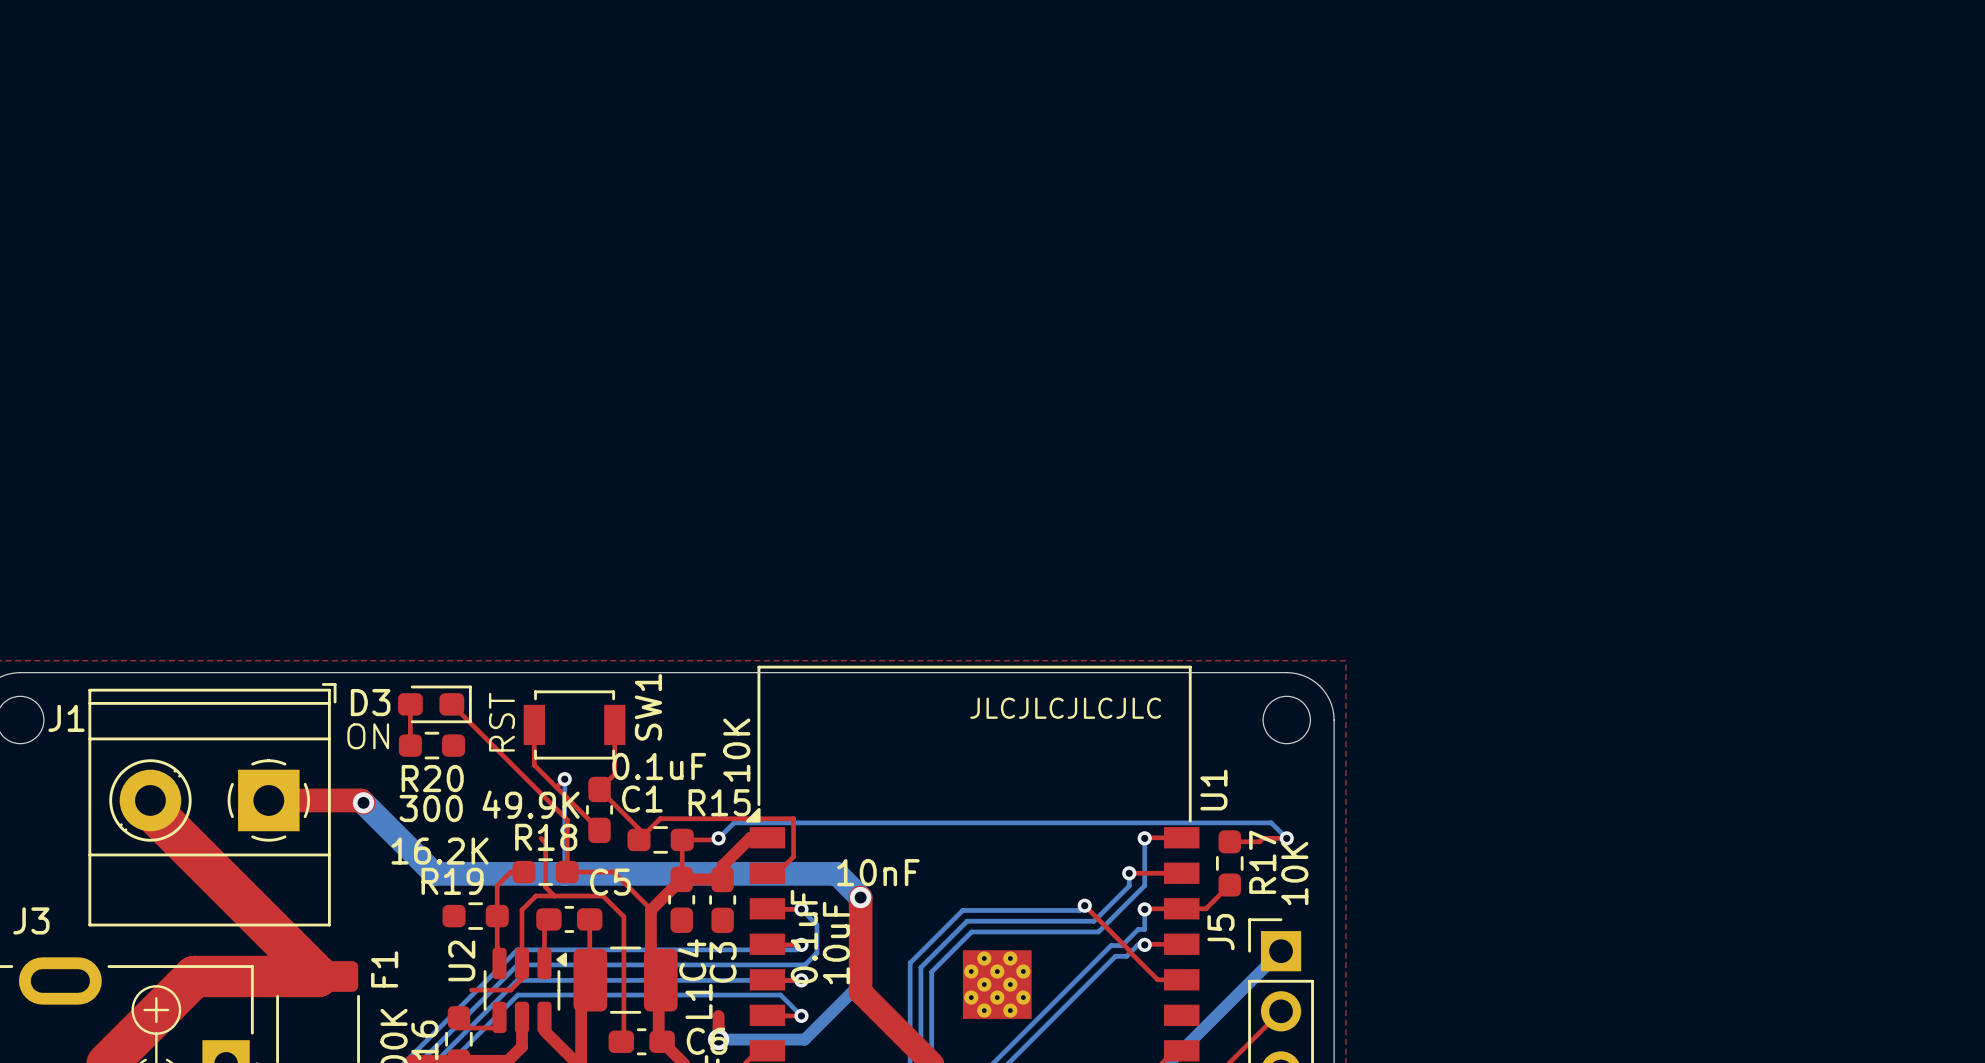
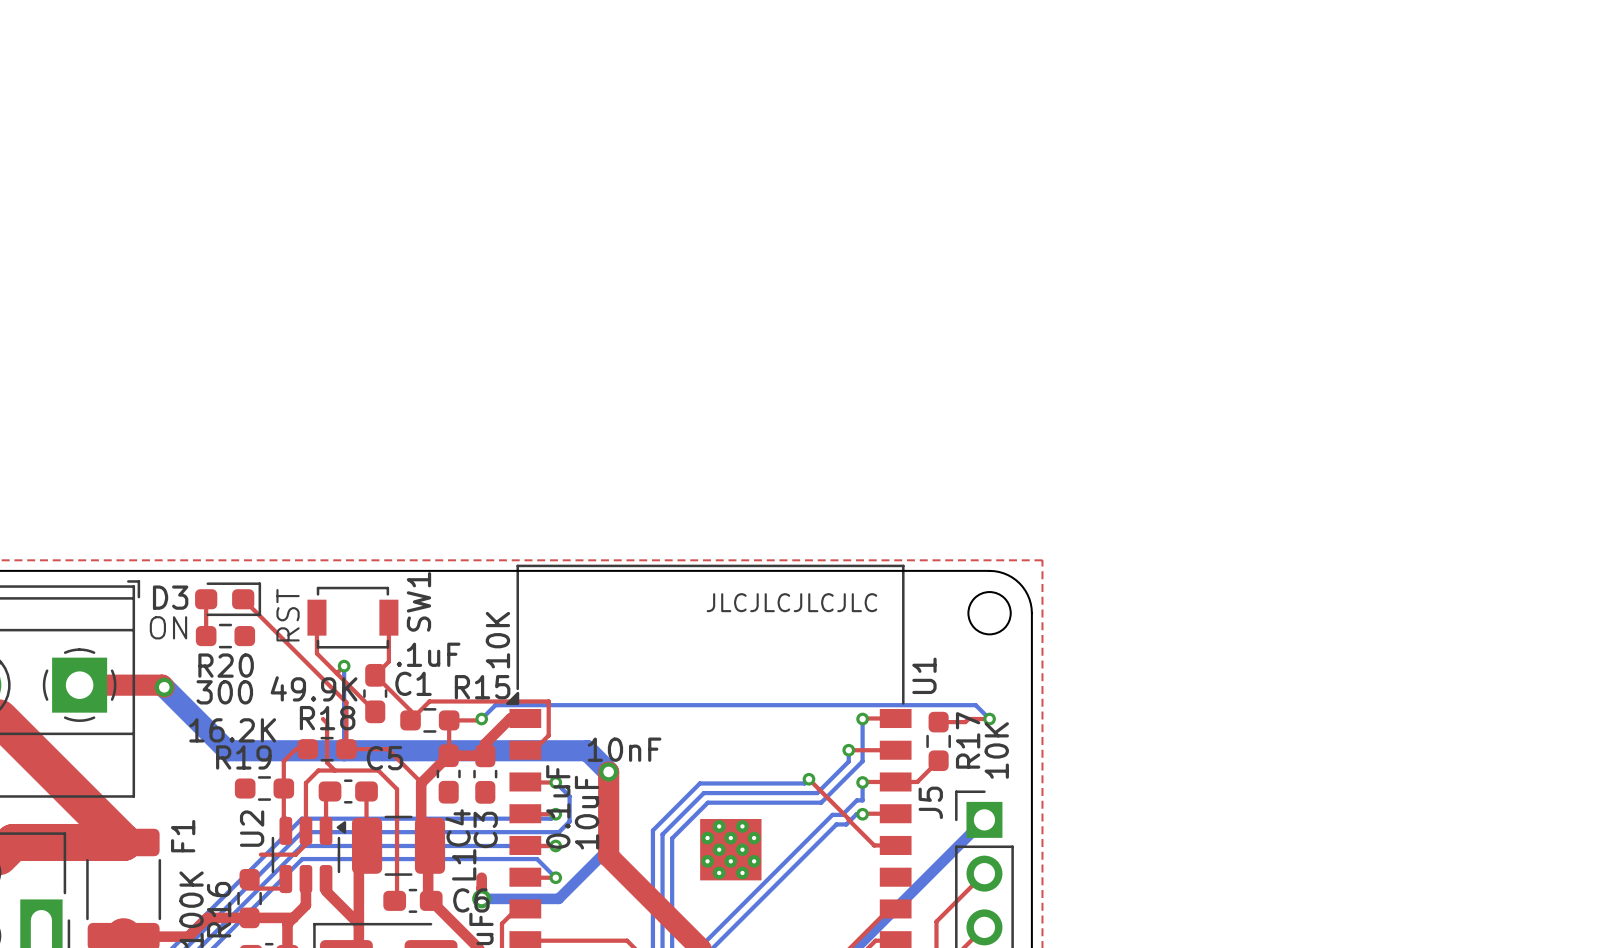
C1 value: 0.1uF (659, 766) -> .1uF (428, 654)

